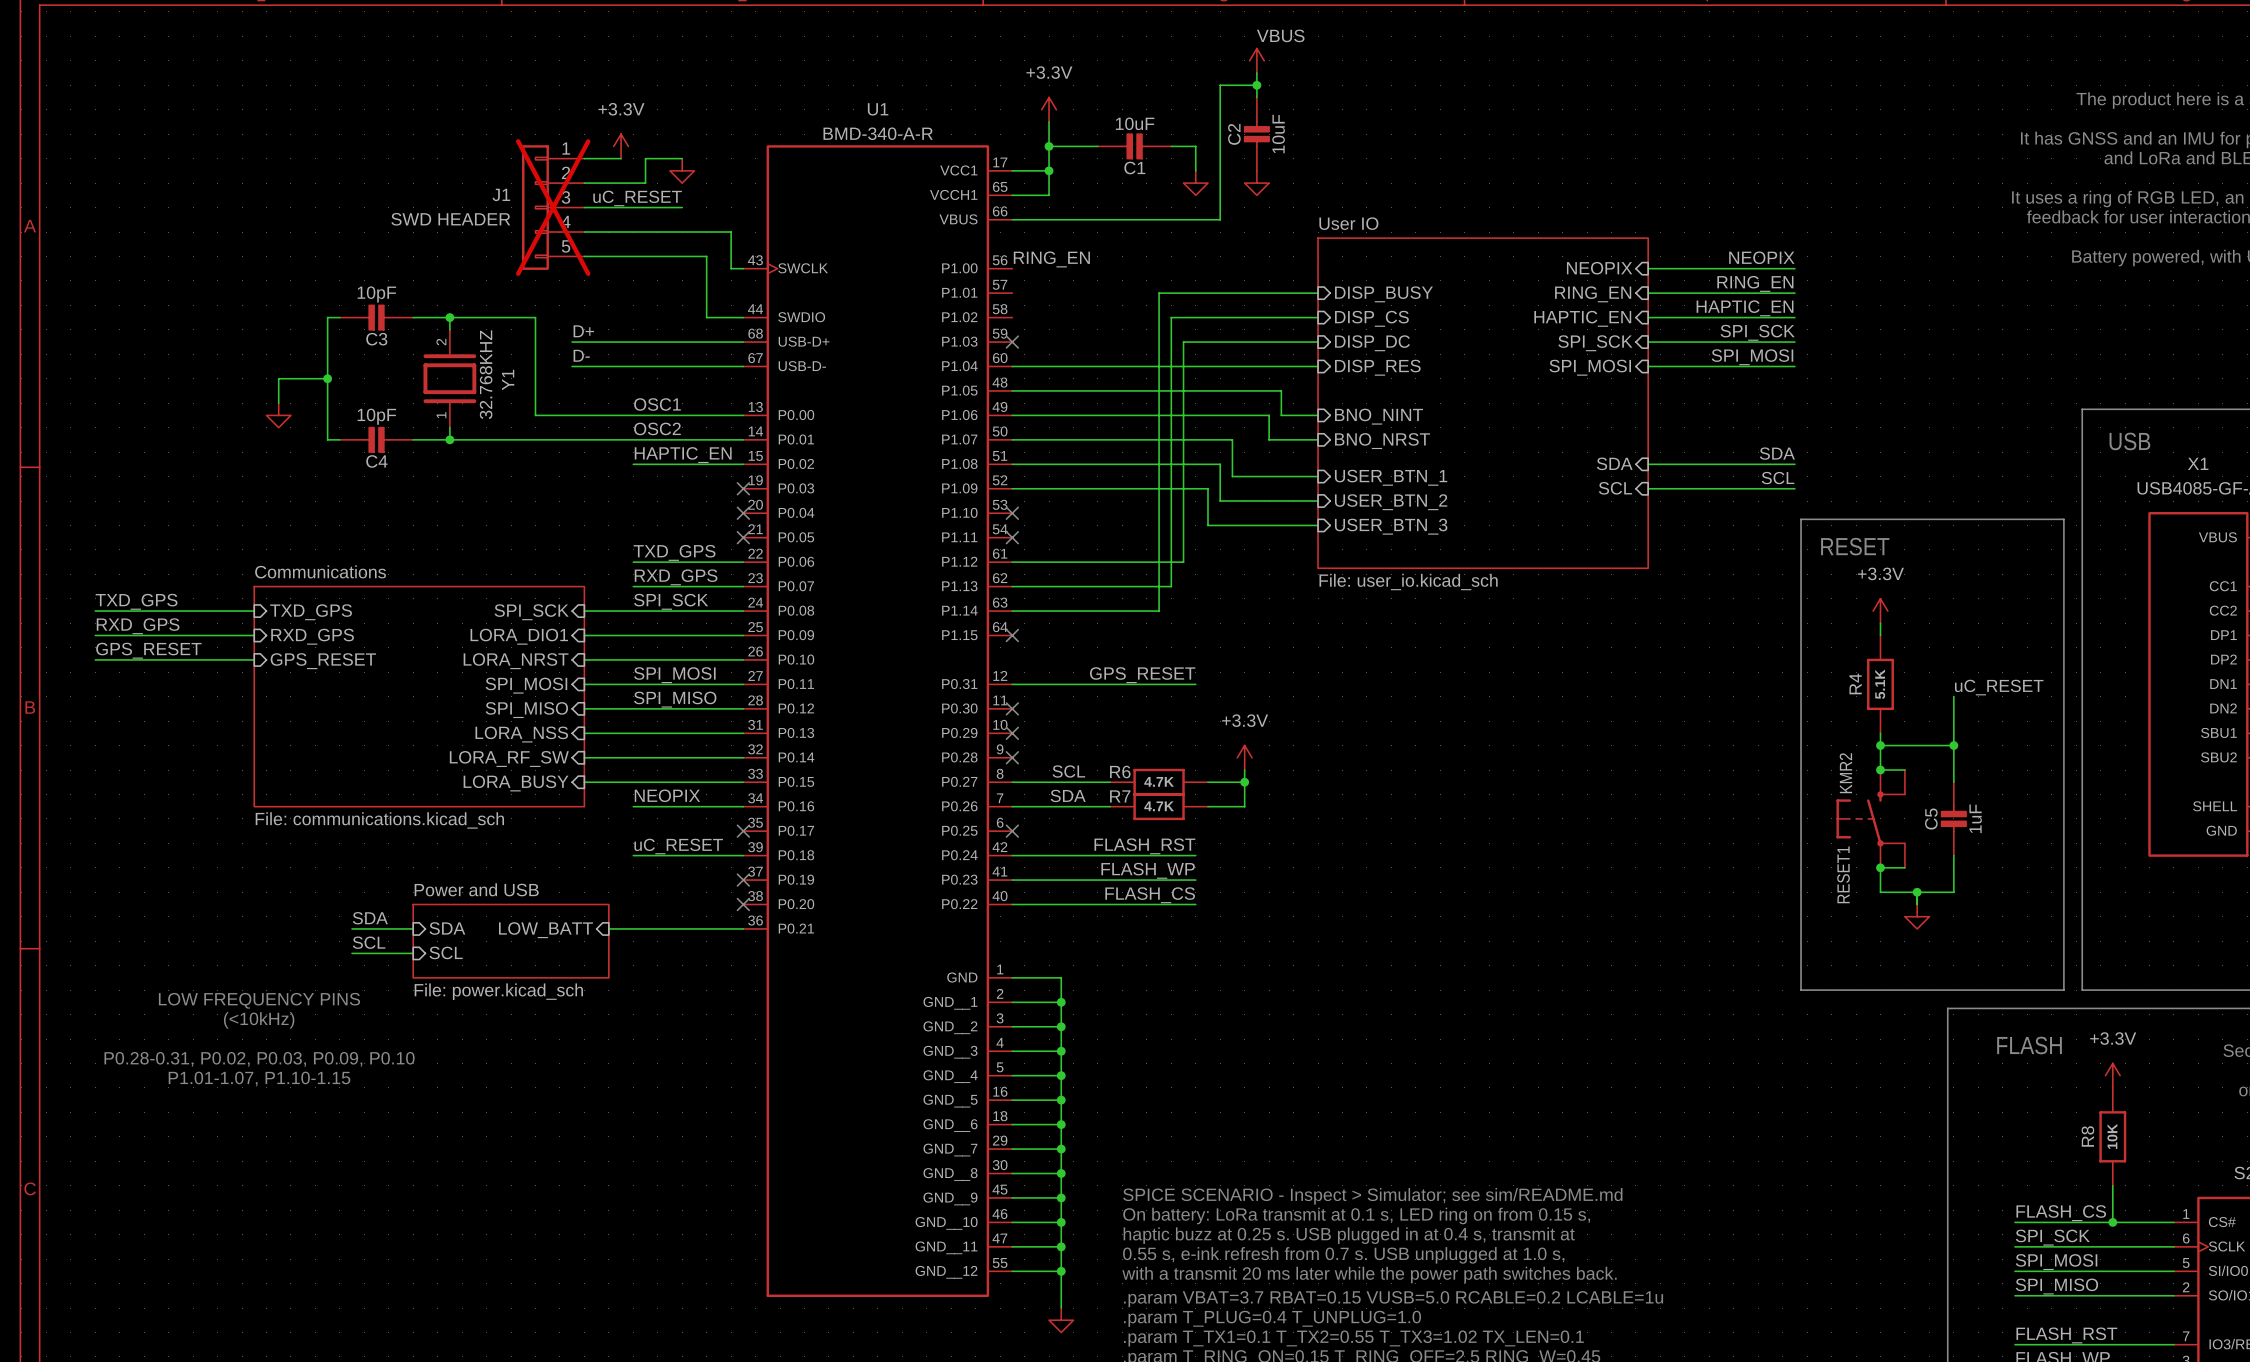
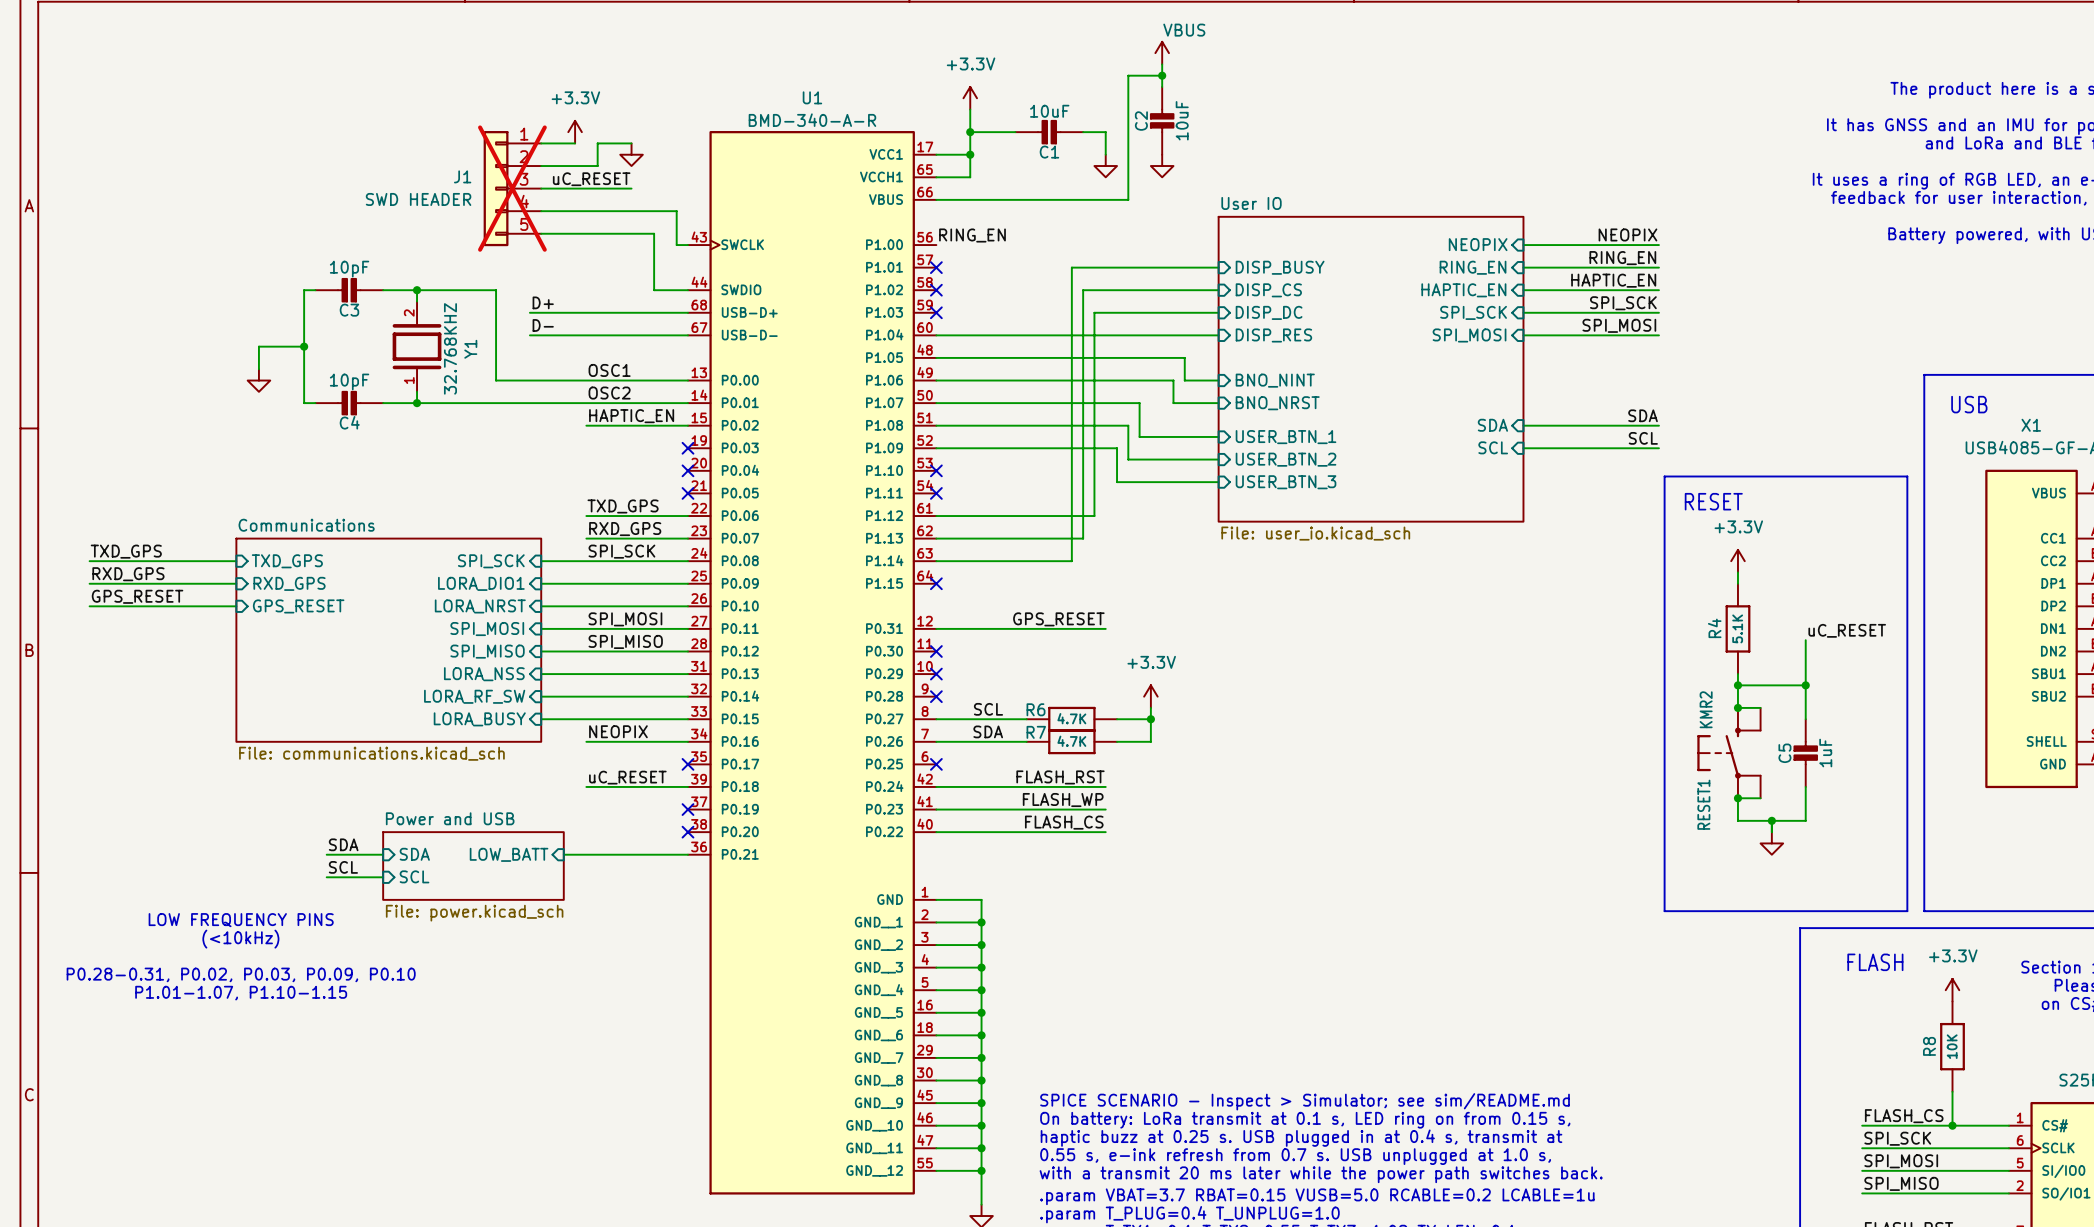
no-connect mark: none -> (936, 267)
no-connect mark: none -> (936, 290)

